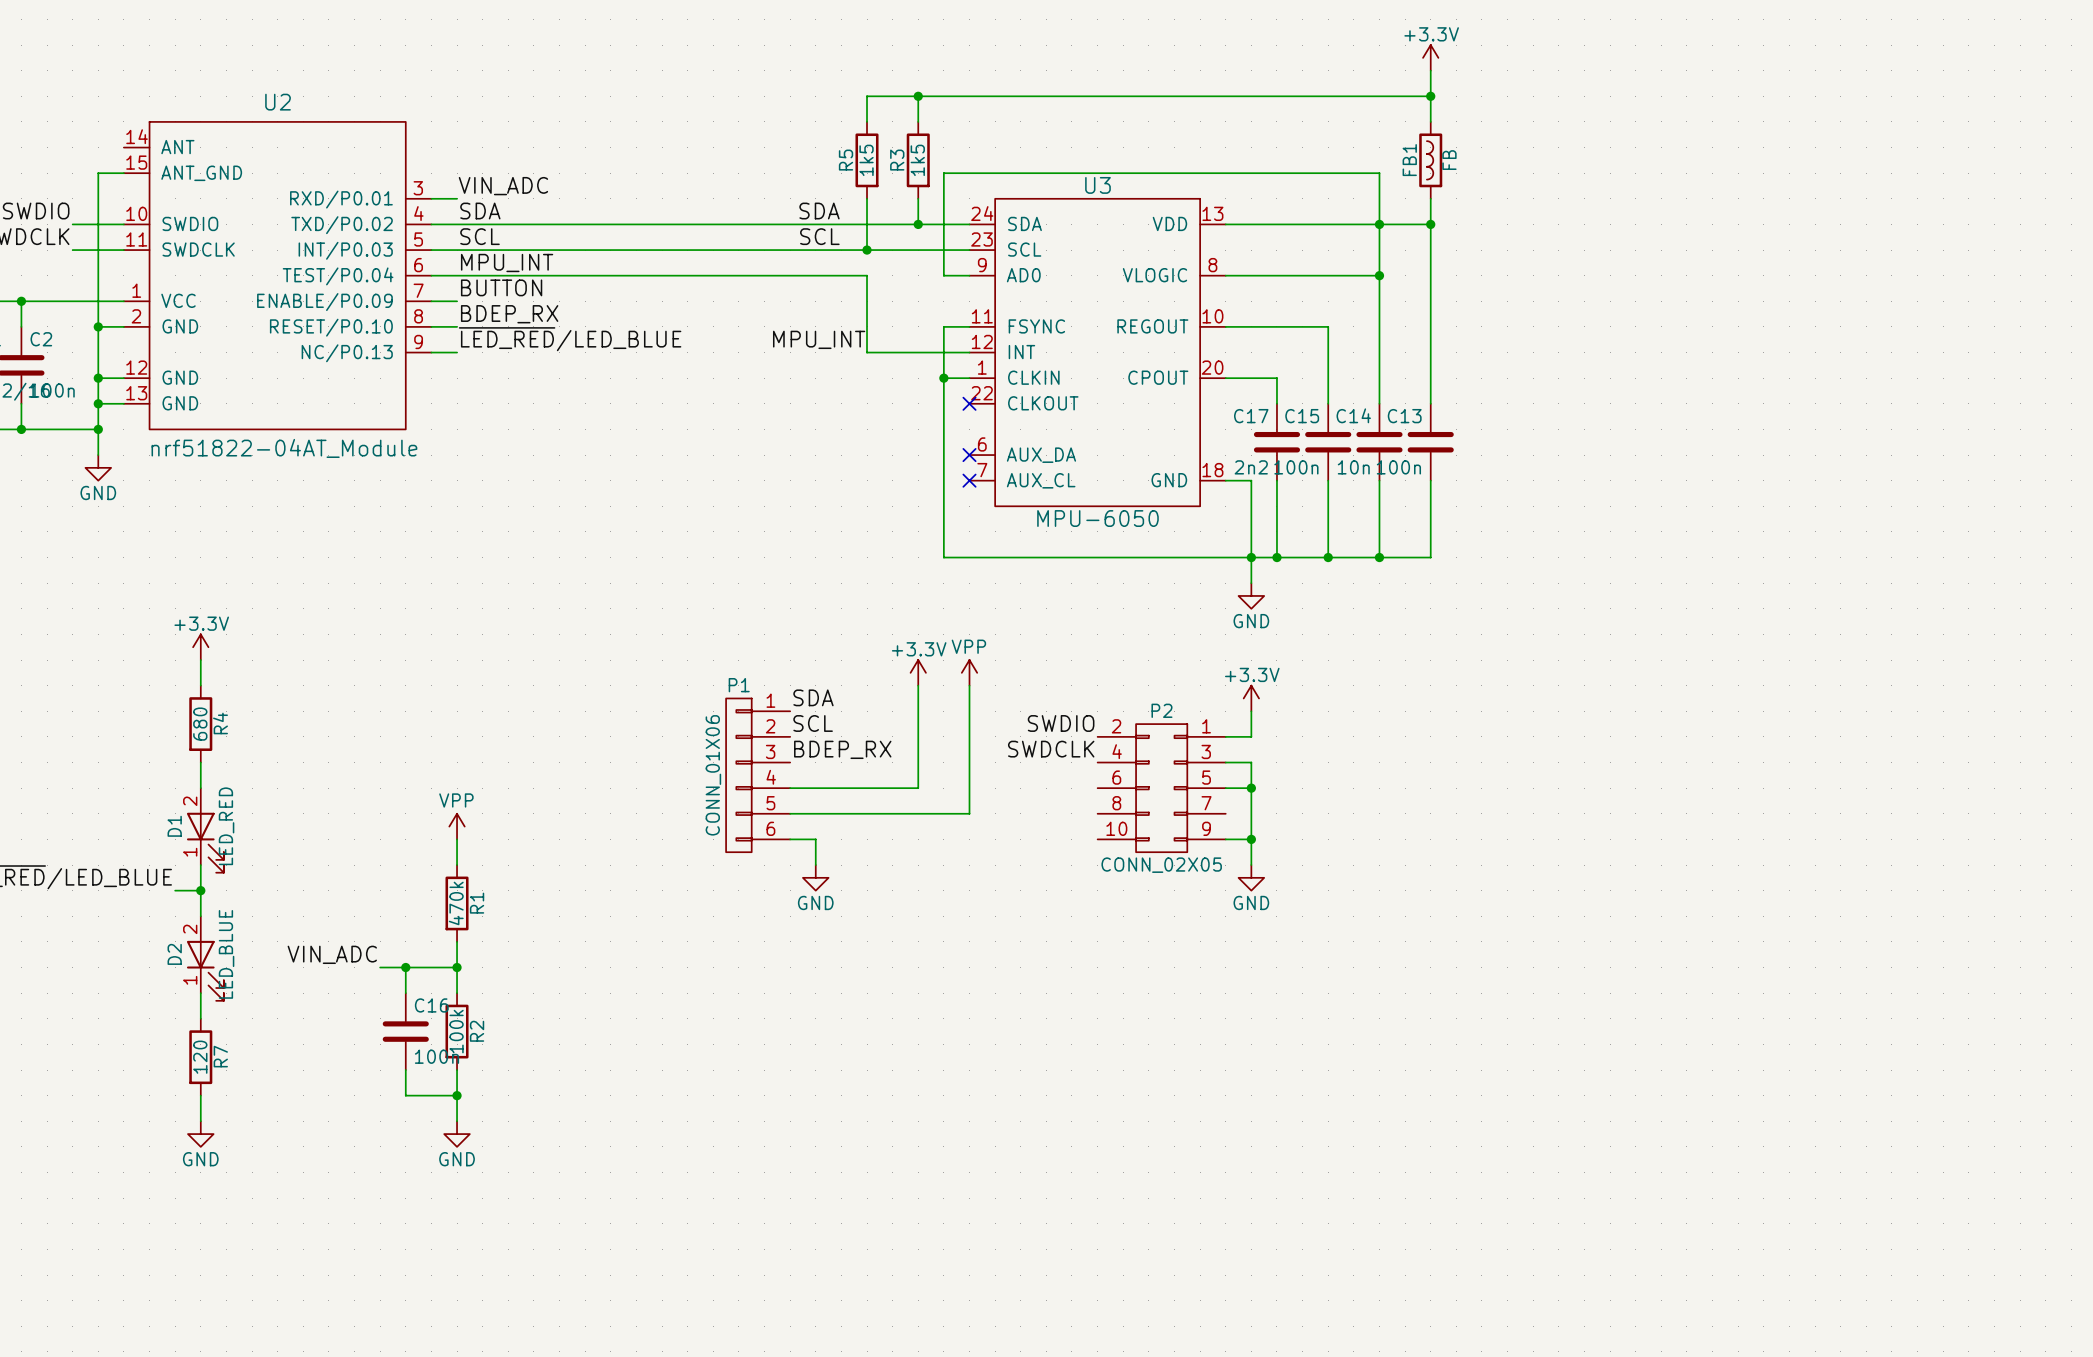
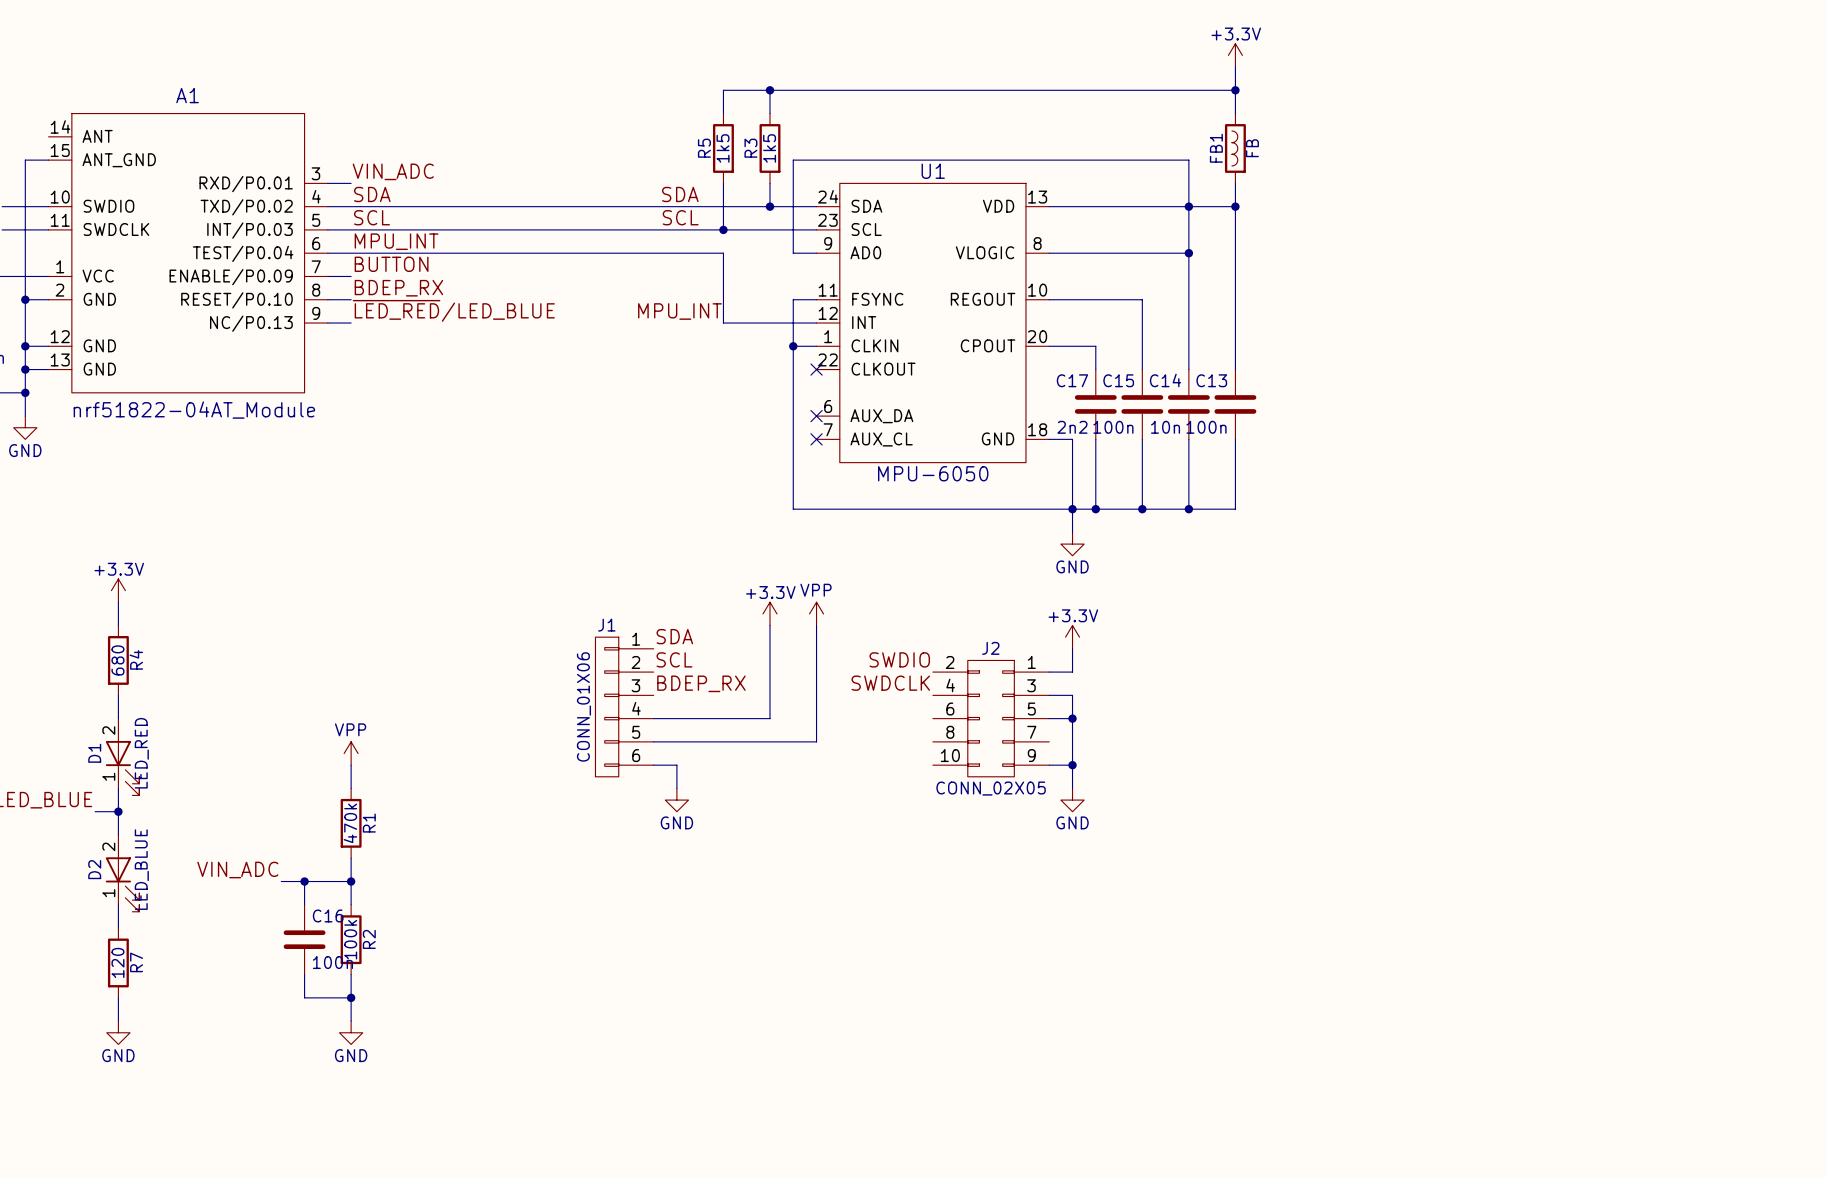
U2 name: U2 (278, 102) -> A1 (187, 95)
U3 name: U3 (1097, 185) -> U1 (933, 171)
P1 name: P1 (739, 685) -> J1 (606, 625)
P2 name: P2 (1161, 710) -> J2 (990, 648)

